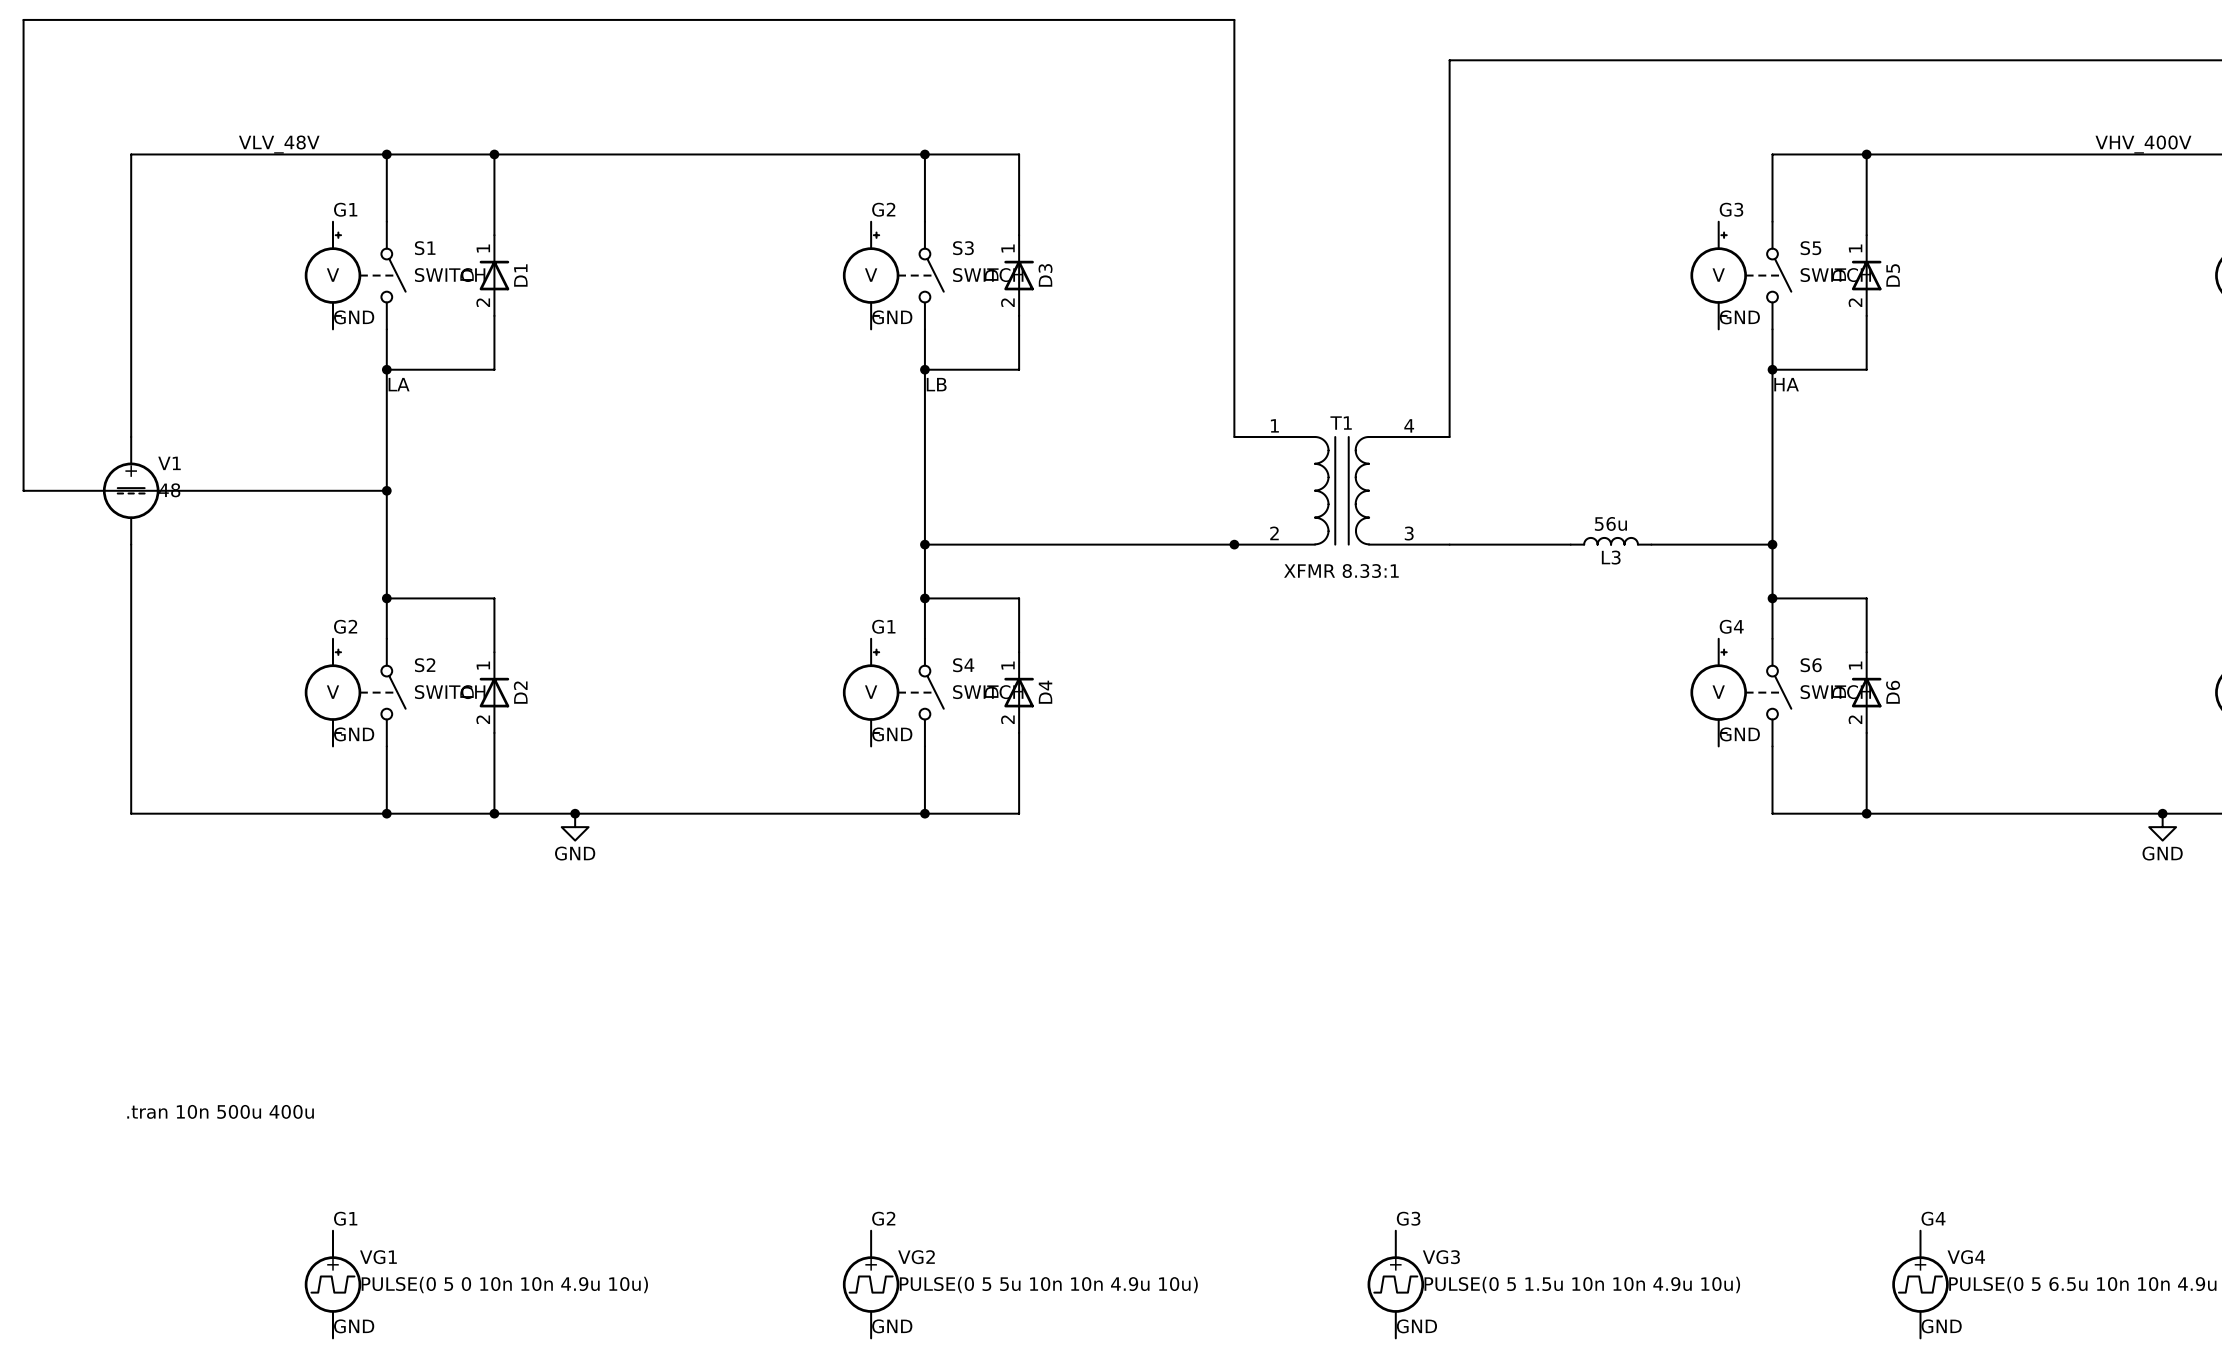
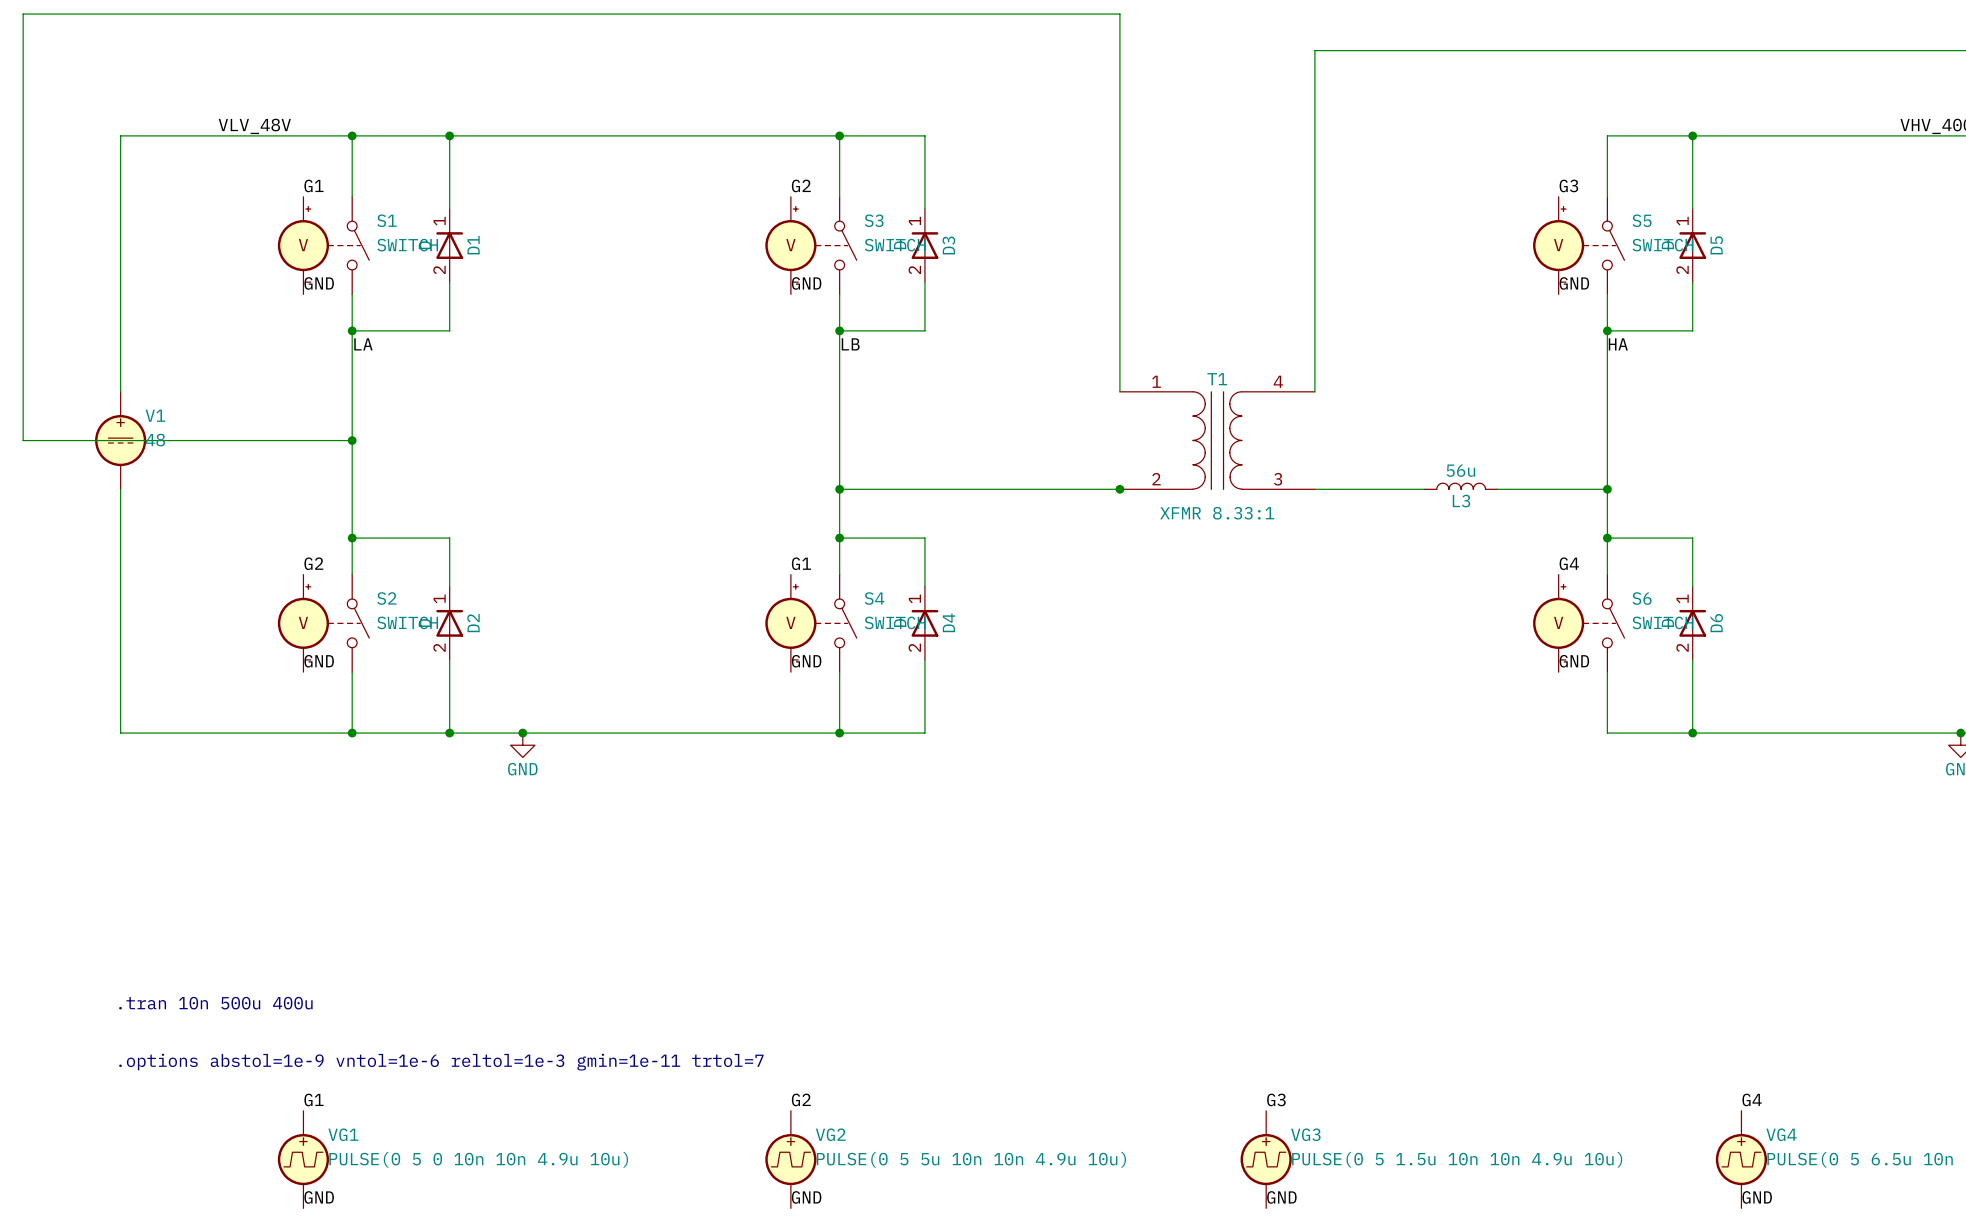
text: none -> .options abstol=1e-9 vntol=1e-6 reltol=1e-3 gmin=1e-11 trtol=7 (441, 1062)

